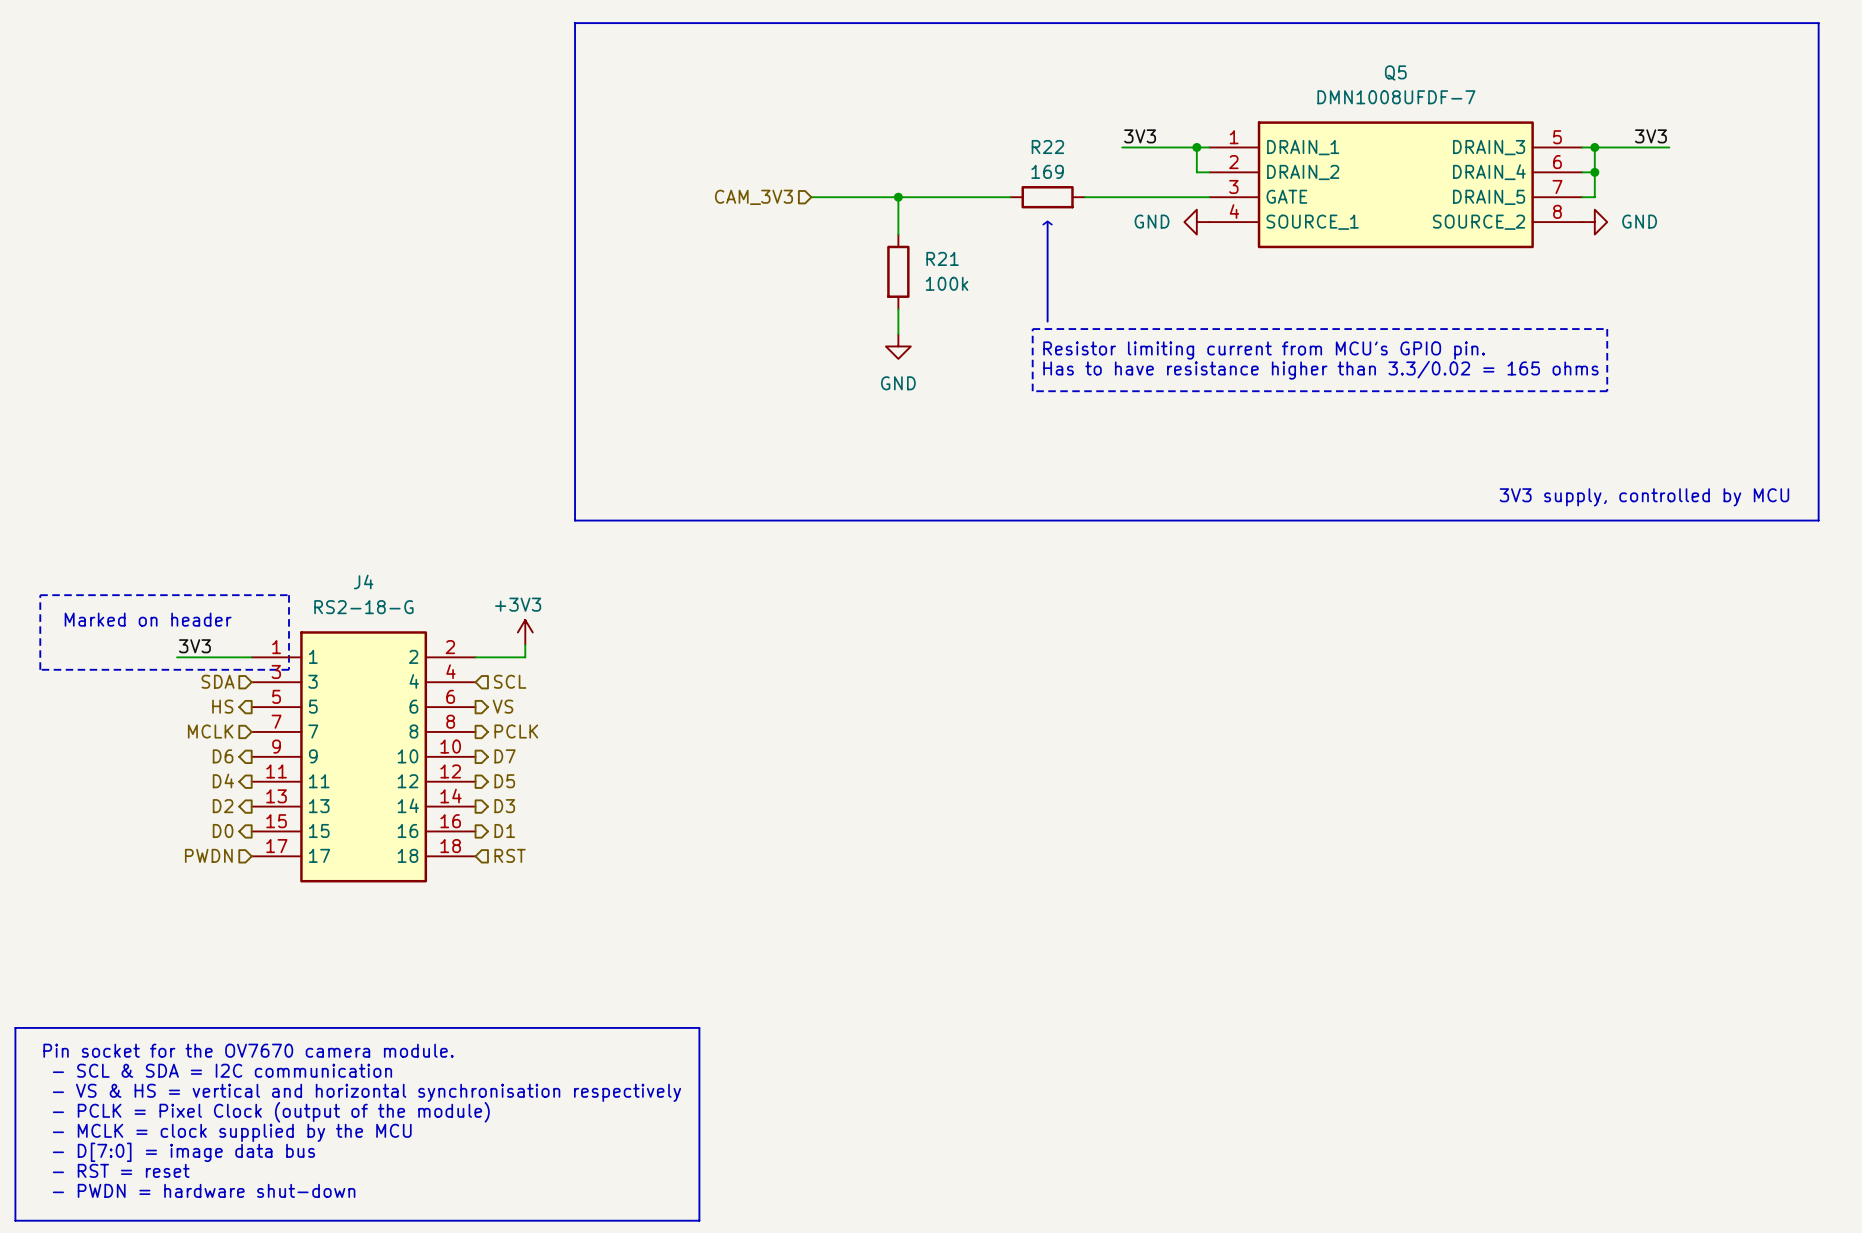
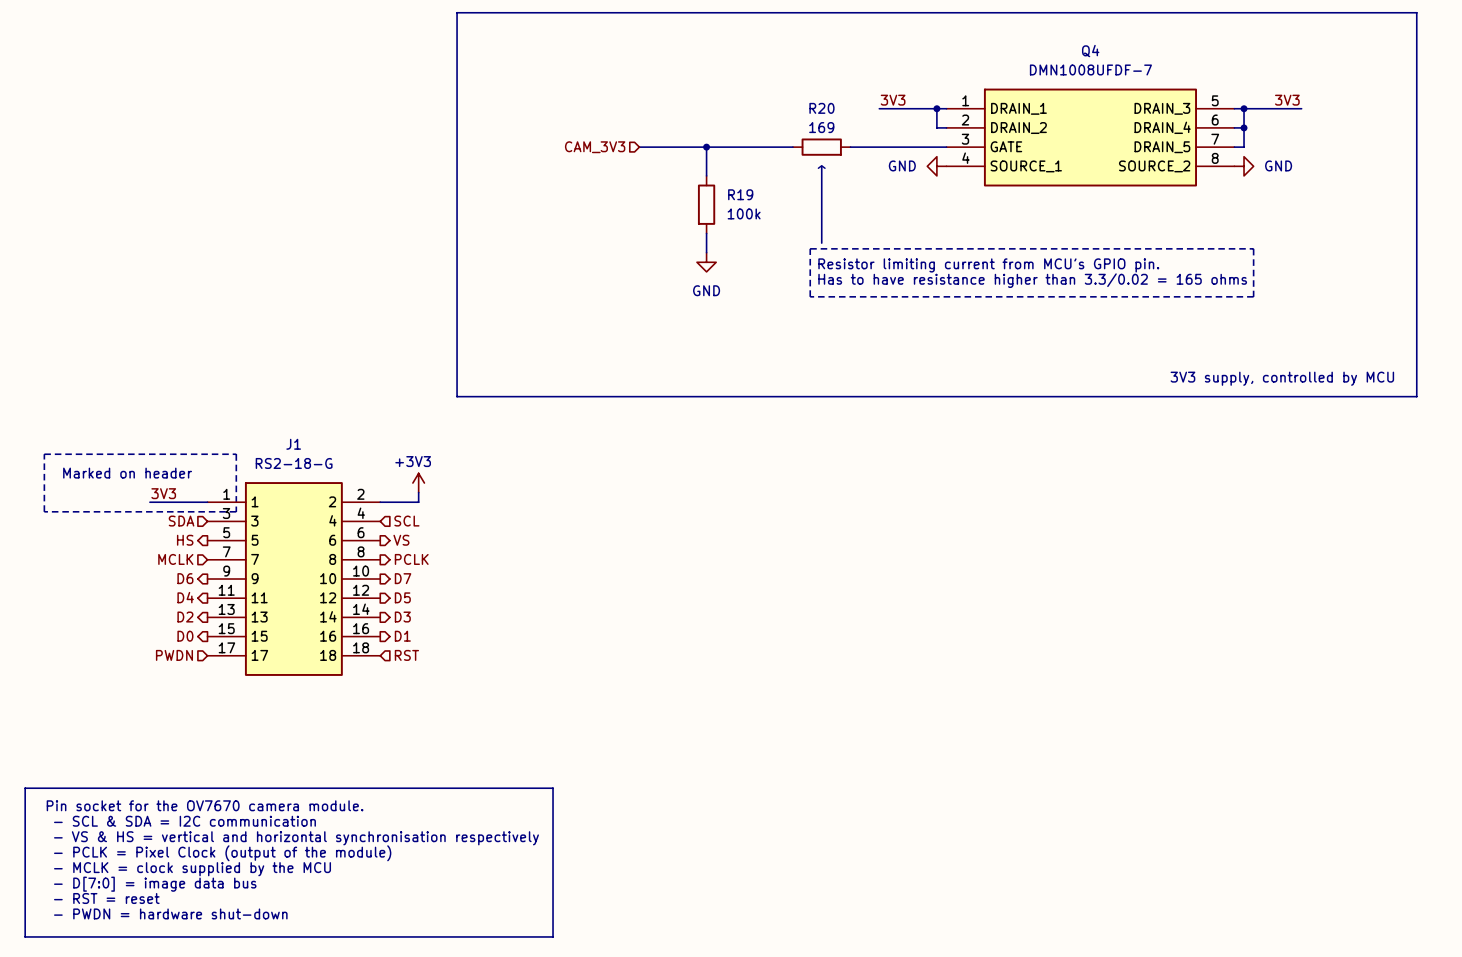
Q5 name: Q5 (1395, 72) -> Q4 (1090, 51)
R22 name: R22 (1047, 147) -> R20 (821, 108)
R21 name: R21 (942, 258) -> R19 (740, 194)
J4 name: J4 (363, 581) -> J1 (293, 444)

